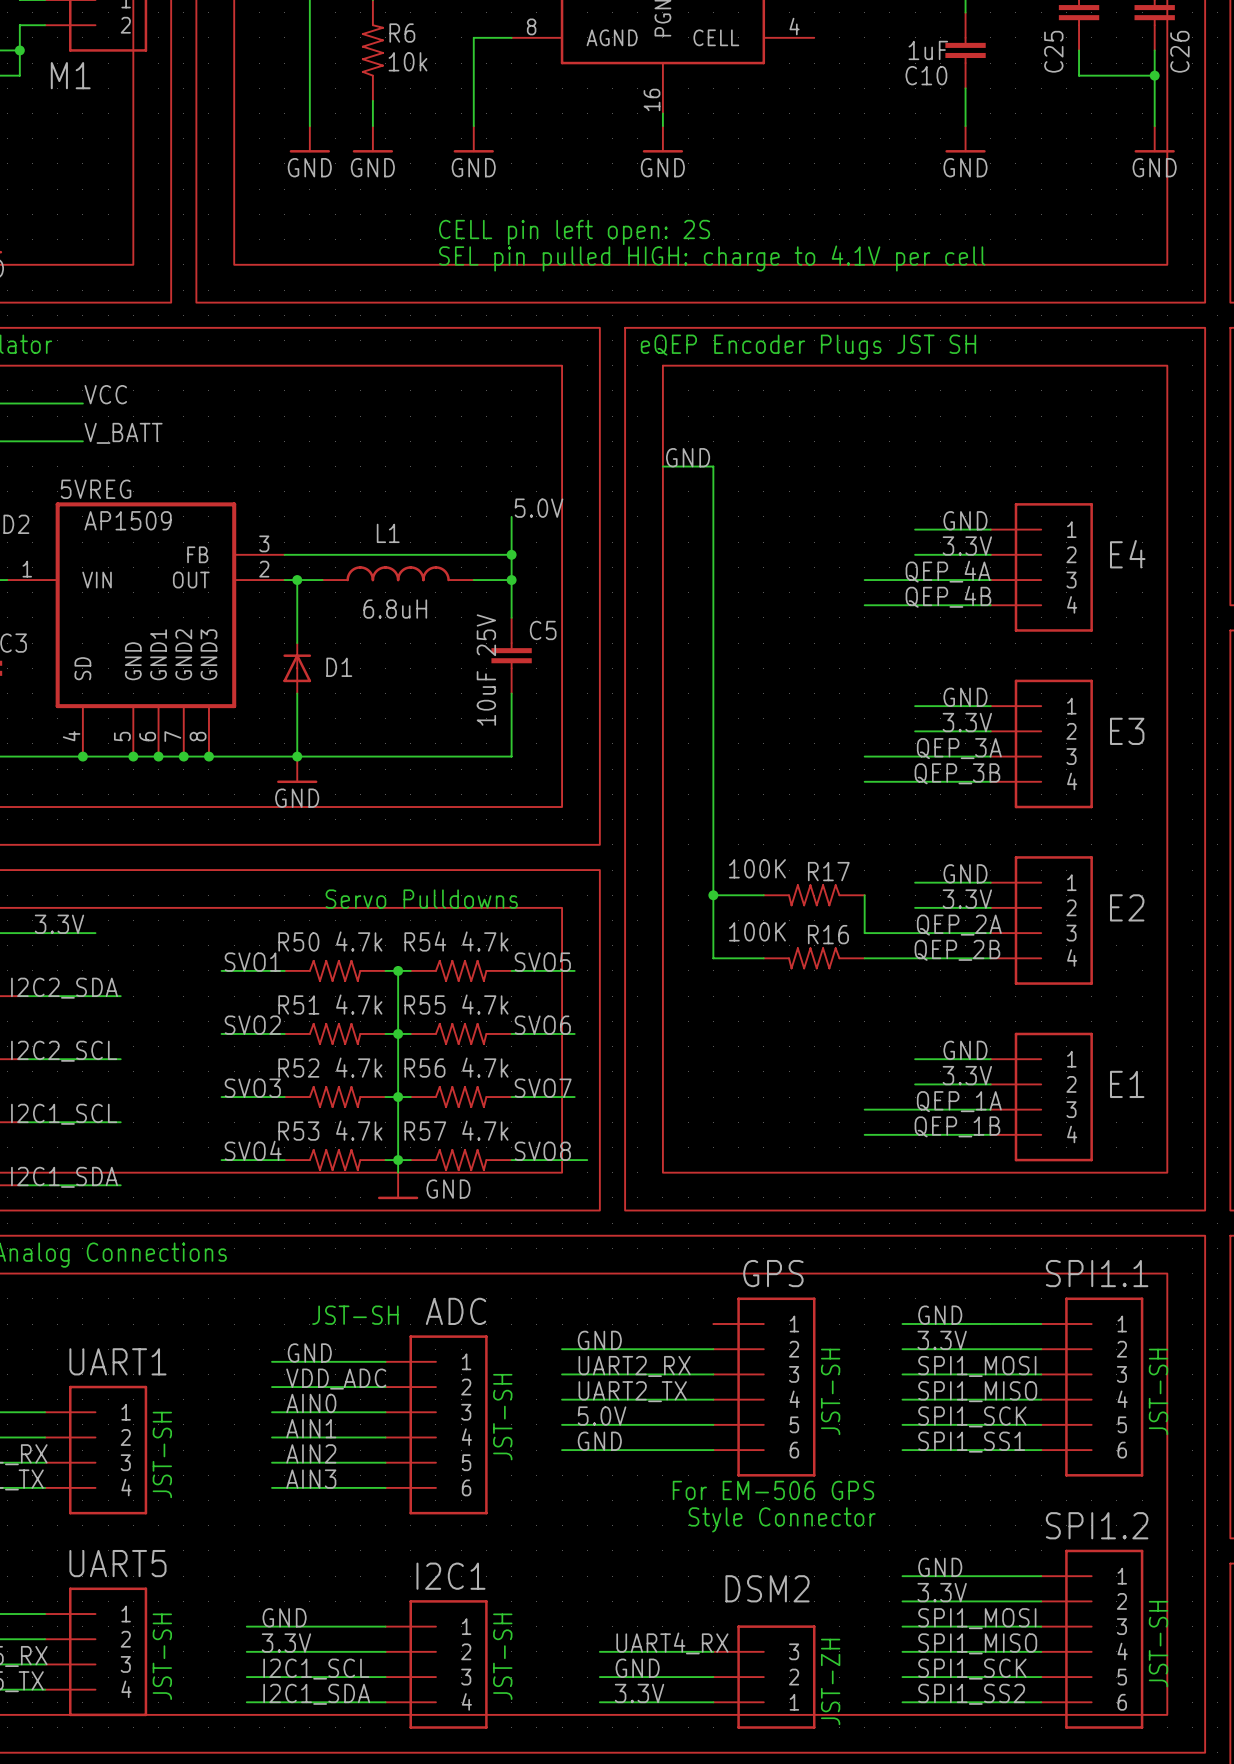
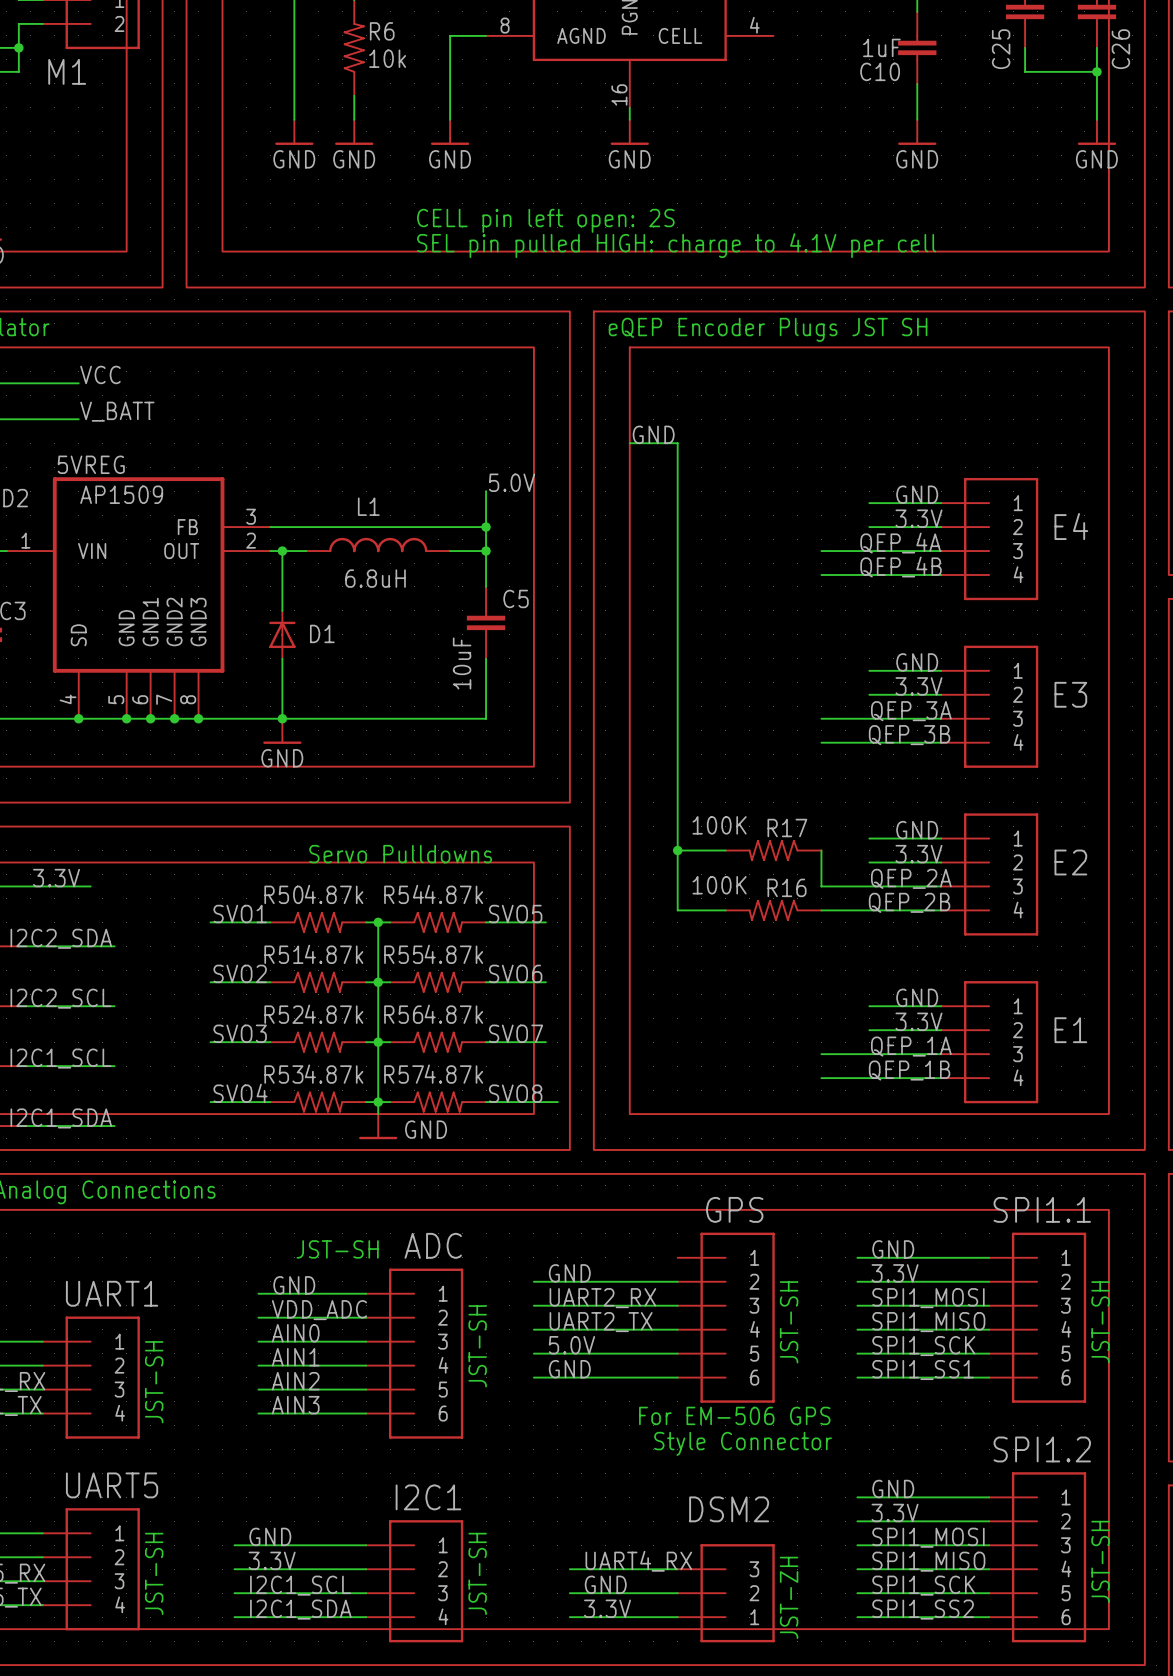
C5 value: 10uF 25V (486, 670) -> 10uF (462, 663)
R50 value: 4.7k (359, 941) -> 4.87k (334, 894)
R54 value: 4.7k (485, 941) -> 4.87k (453, 894)
R51 value: 4.7k (359, 1004) -> 4.87k (334, 954)
R55 value: 4.7k (485, 1004) -> 4.87k (453, 954)
R52 value: 4.7k (359, 1067) -> 4.87k (334, 1014)
R56 value: 4.7k (485, 1067) -> 4.87k (453, 1014)
R53 value: 4.7k (359, 1130) -> 4.87k (334, 1074)
R57 value: 4.7k (485, 1130) -> 4.87k (453, 1074)

